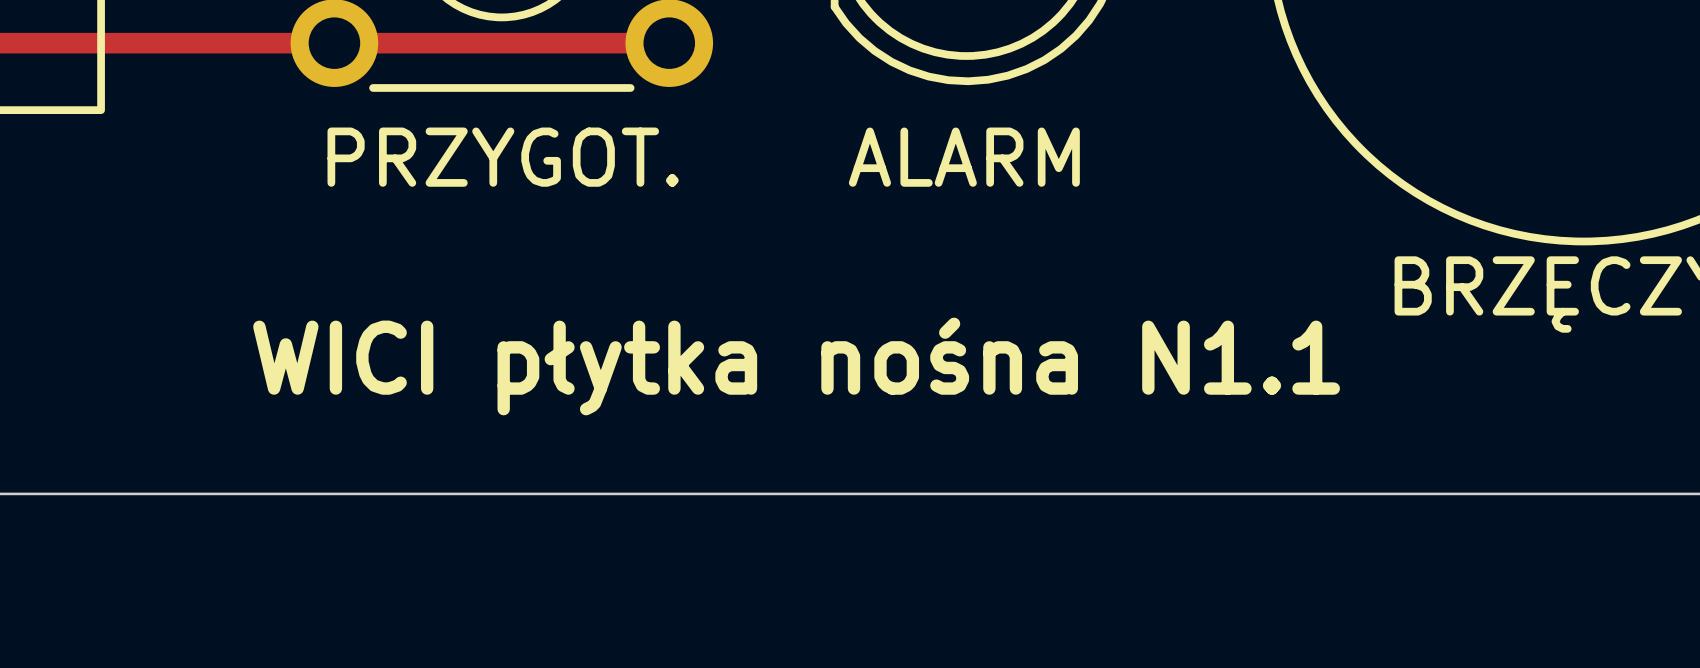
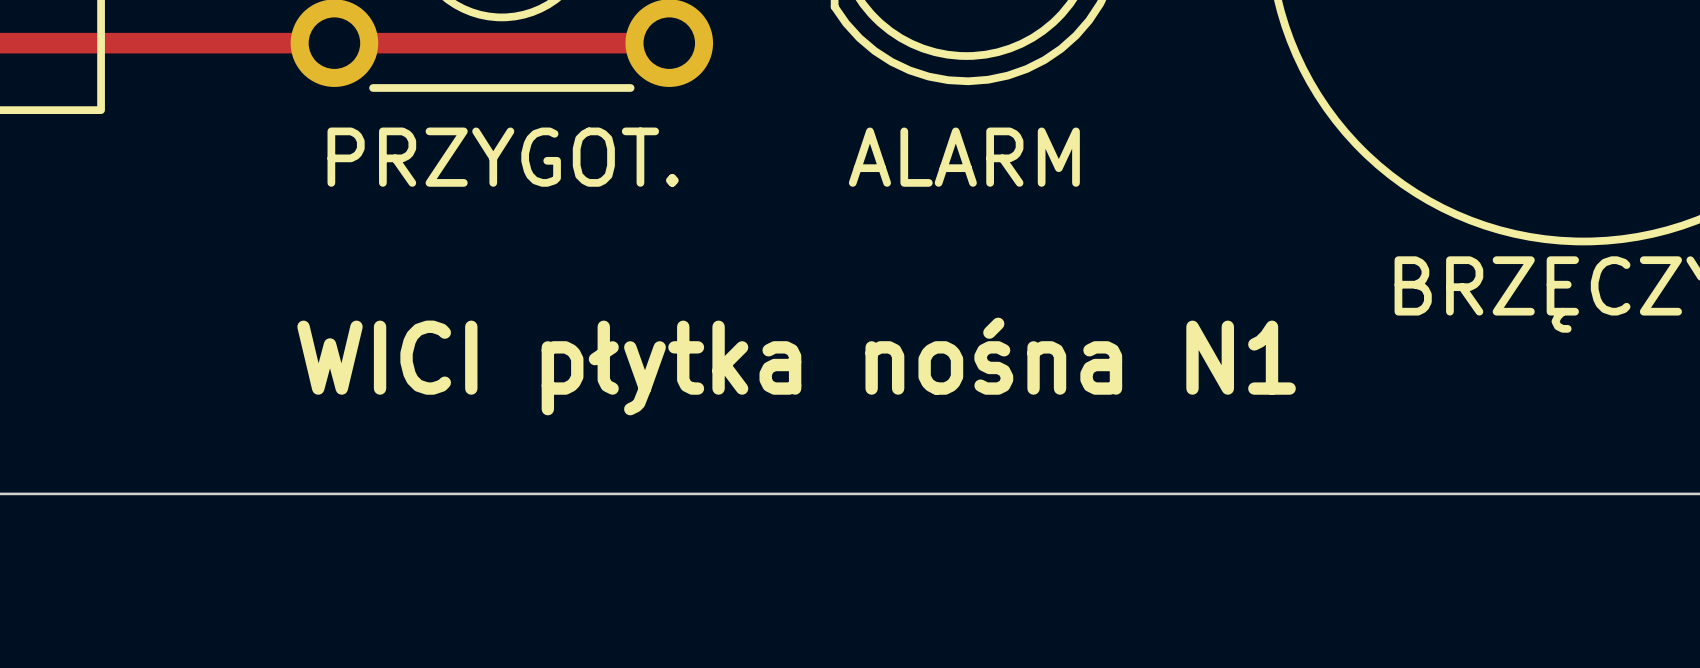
text: WICI płytka nośna N1.1 (796, 366) -> WICI płytka nośna N1 (796, 366)

